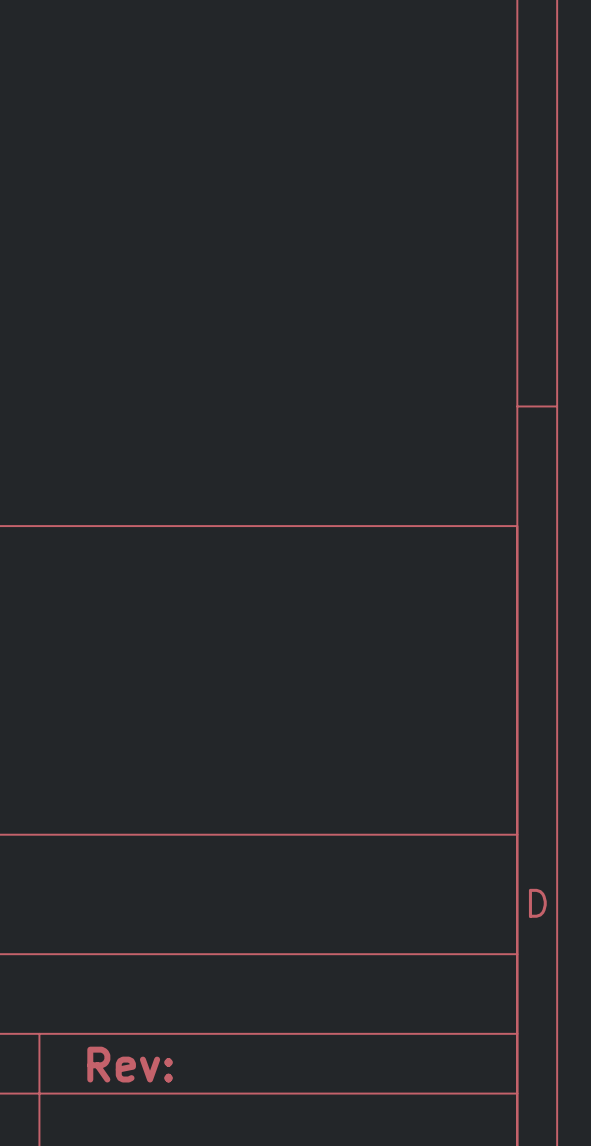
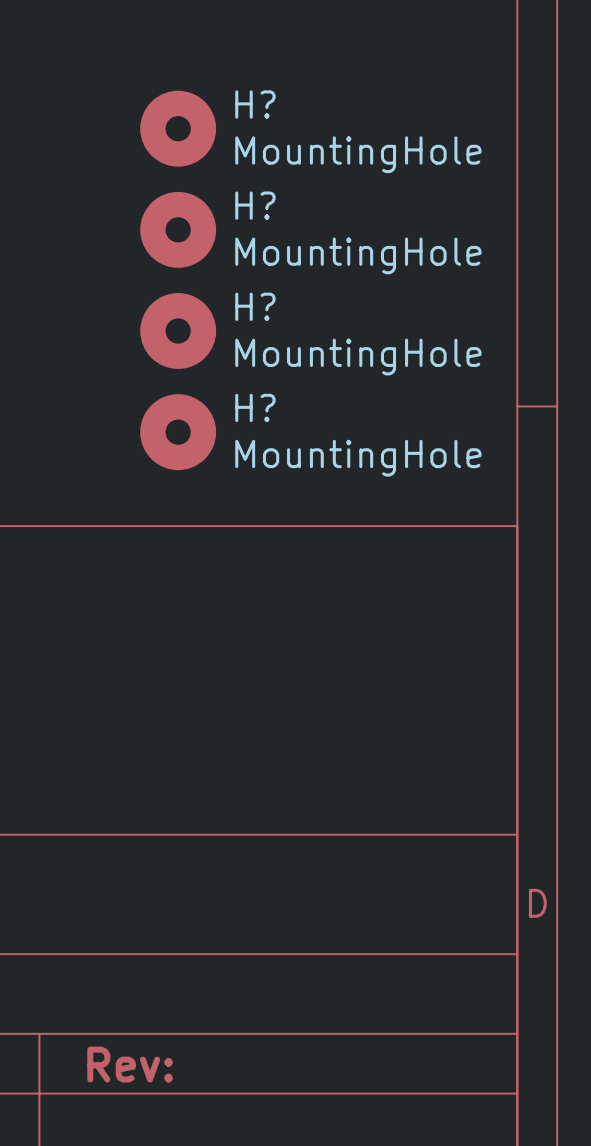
H?: none -> MountingHole (178, 128)
H?: none -> MountingHole (178, 229)
H?: none -> MountingHole (178, 331)
H?: none -> MountingHole (178, 432)

